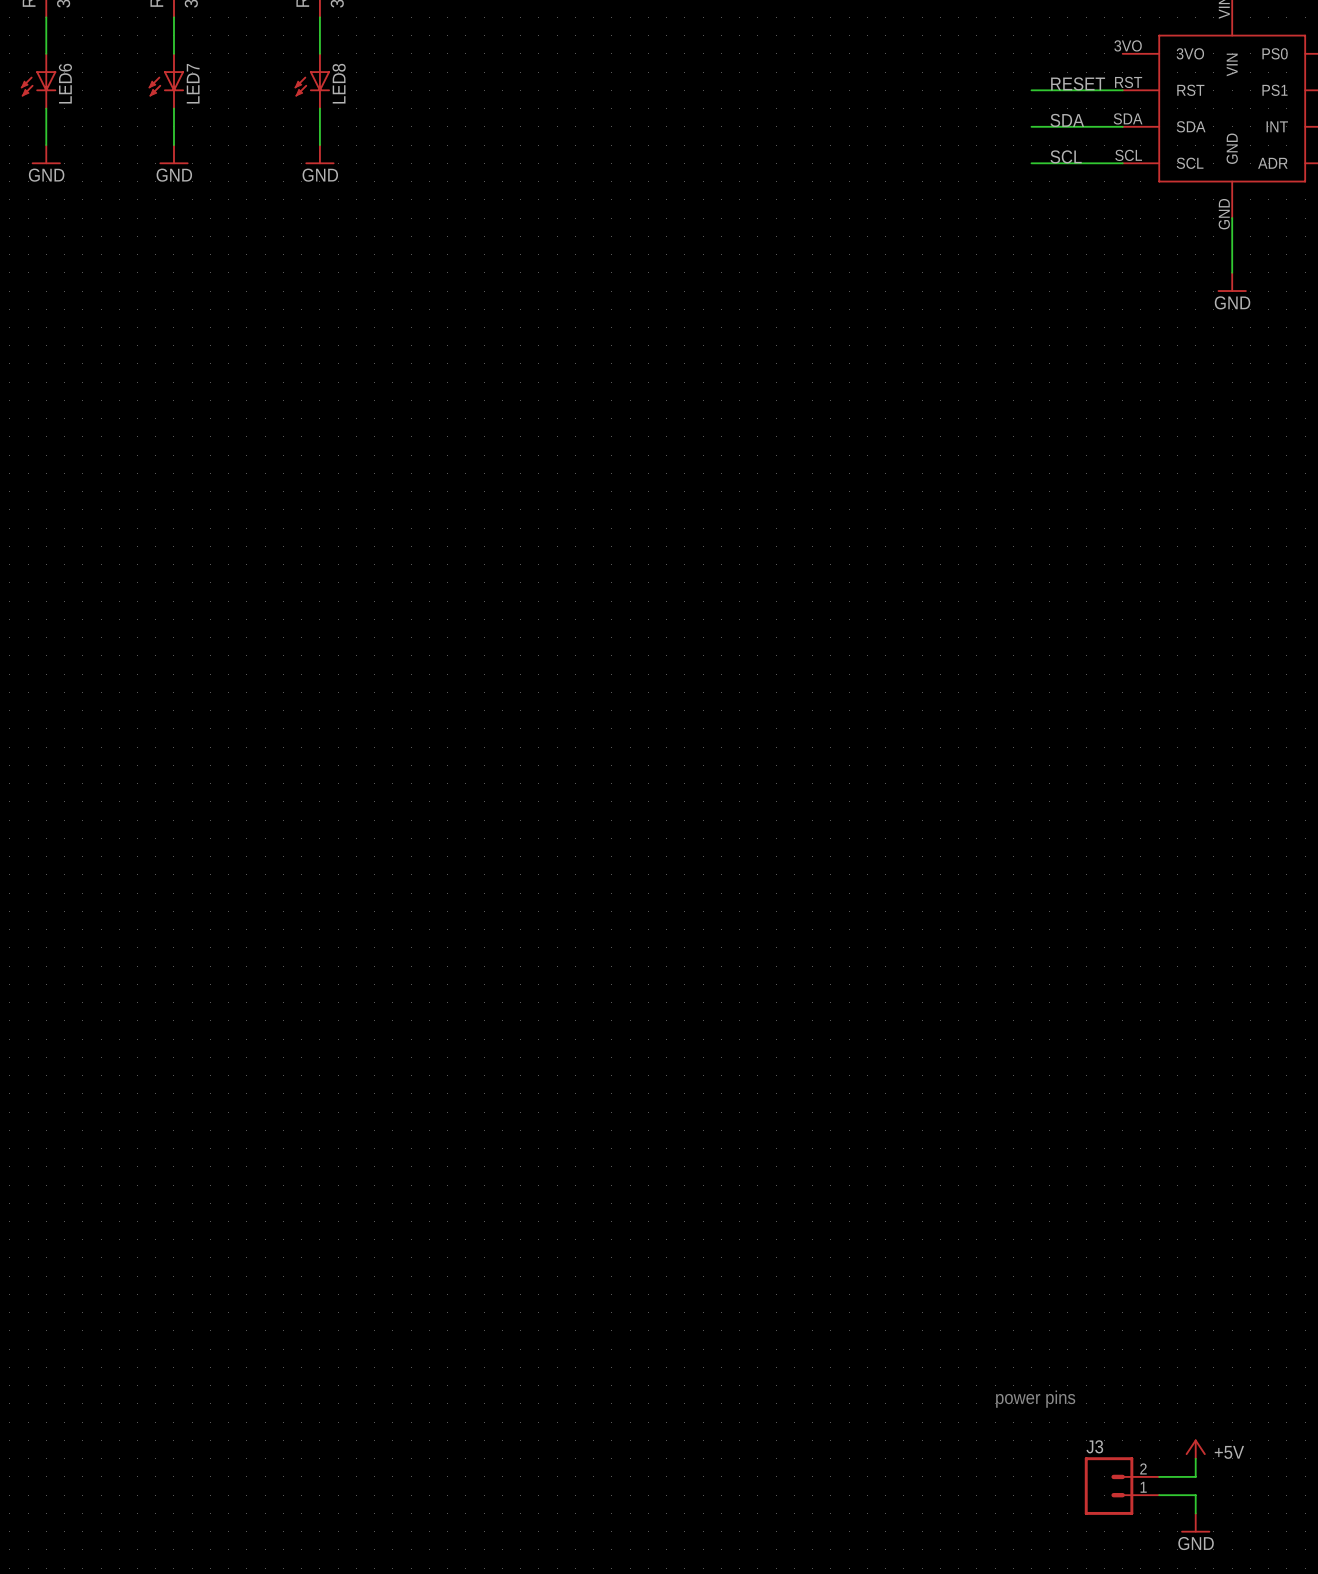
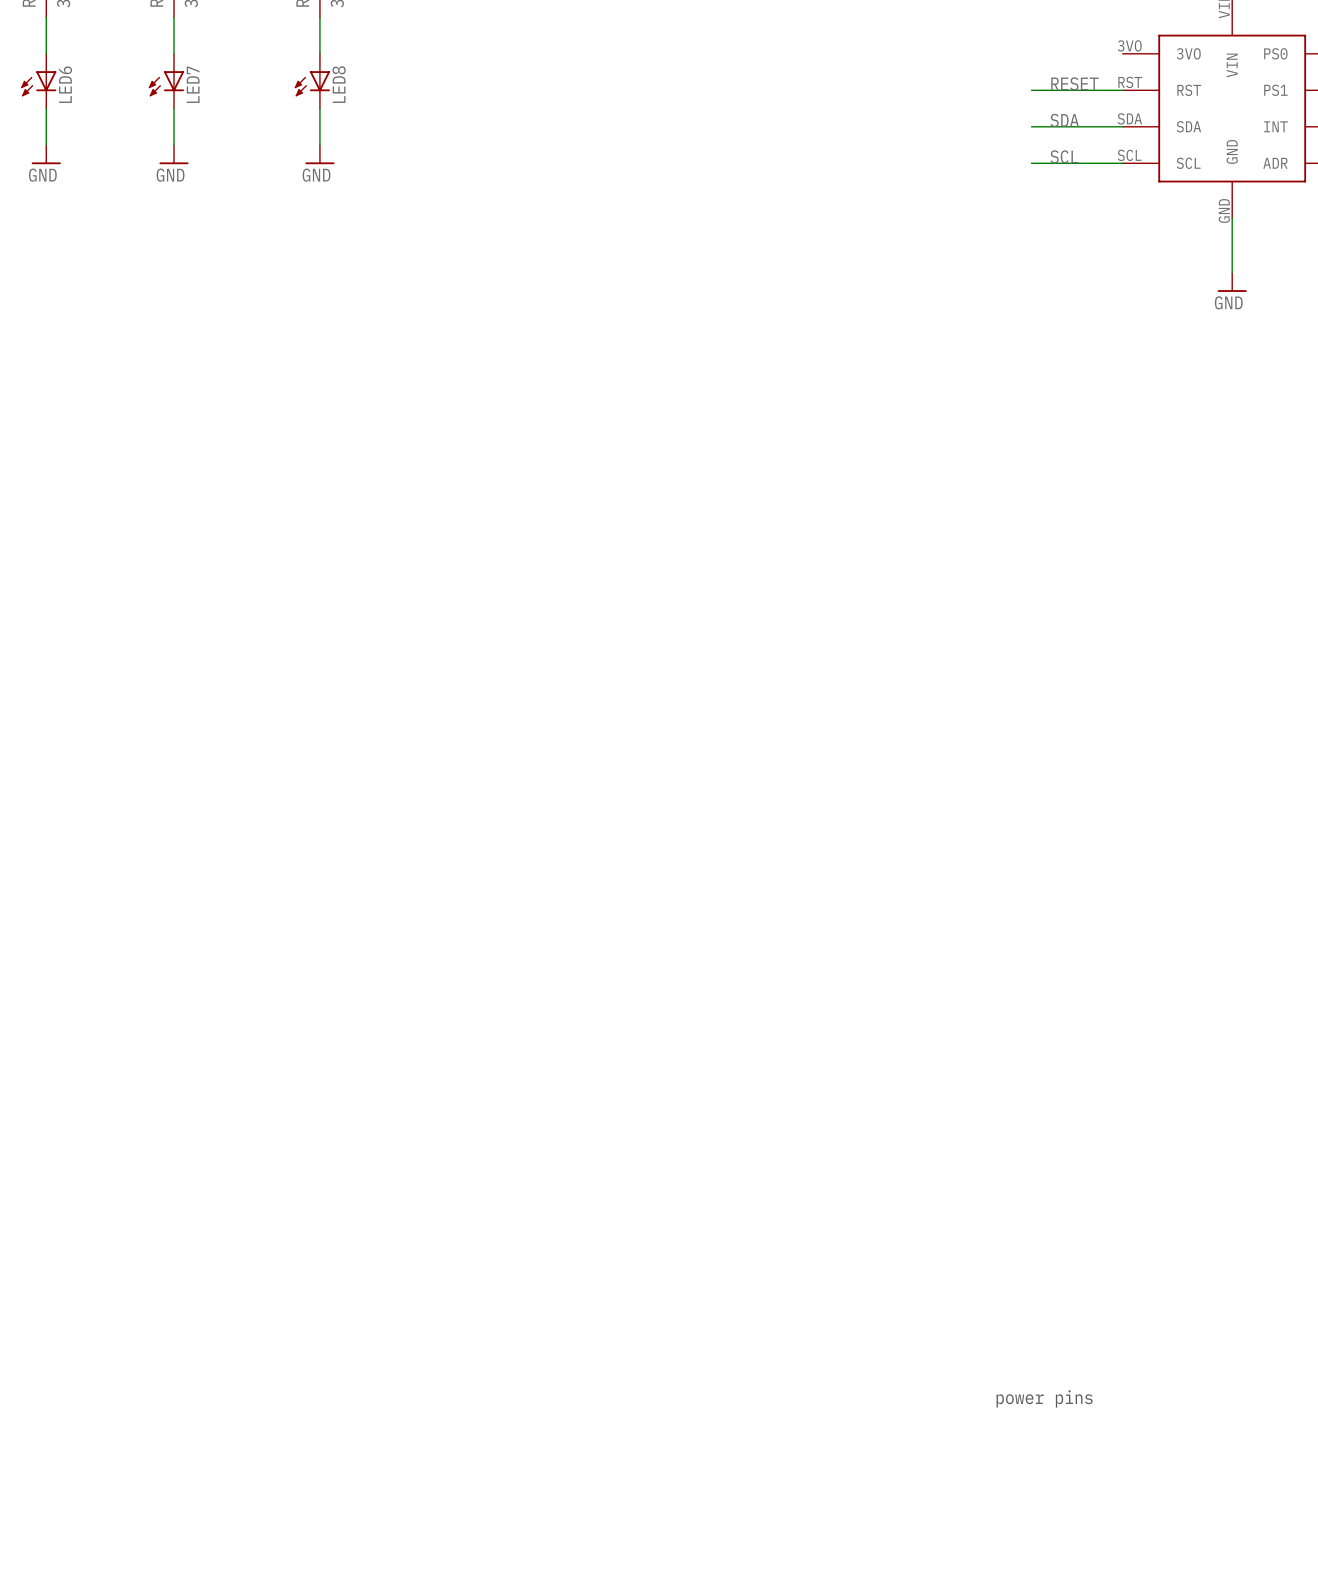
power symbol: +5V (1195, 1449) -> none
wire: (1195, 1458) (1195, 1476) (1159, 1476) -> none
J3: (1122, 1486) -> none
wire: (1159, 1495) (1195, 1495) (1195, 1513) -> none
power symbol: GND (1195, 1523) -> none

